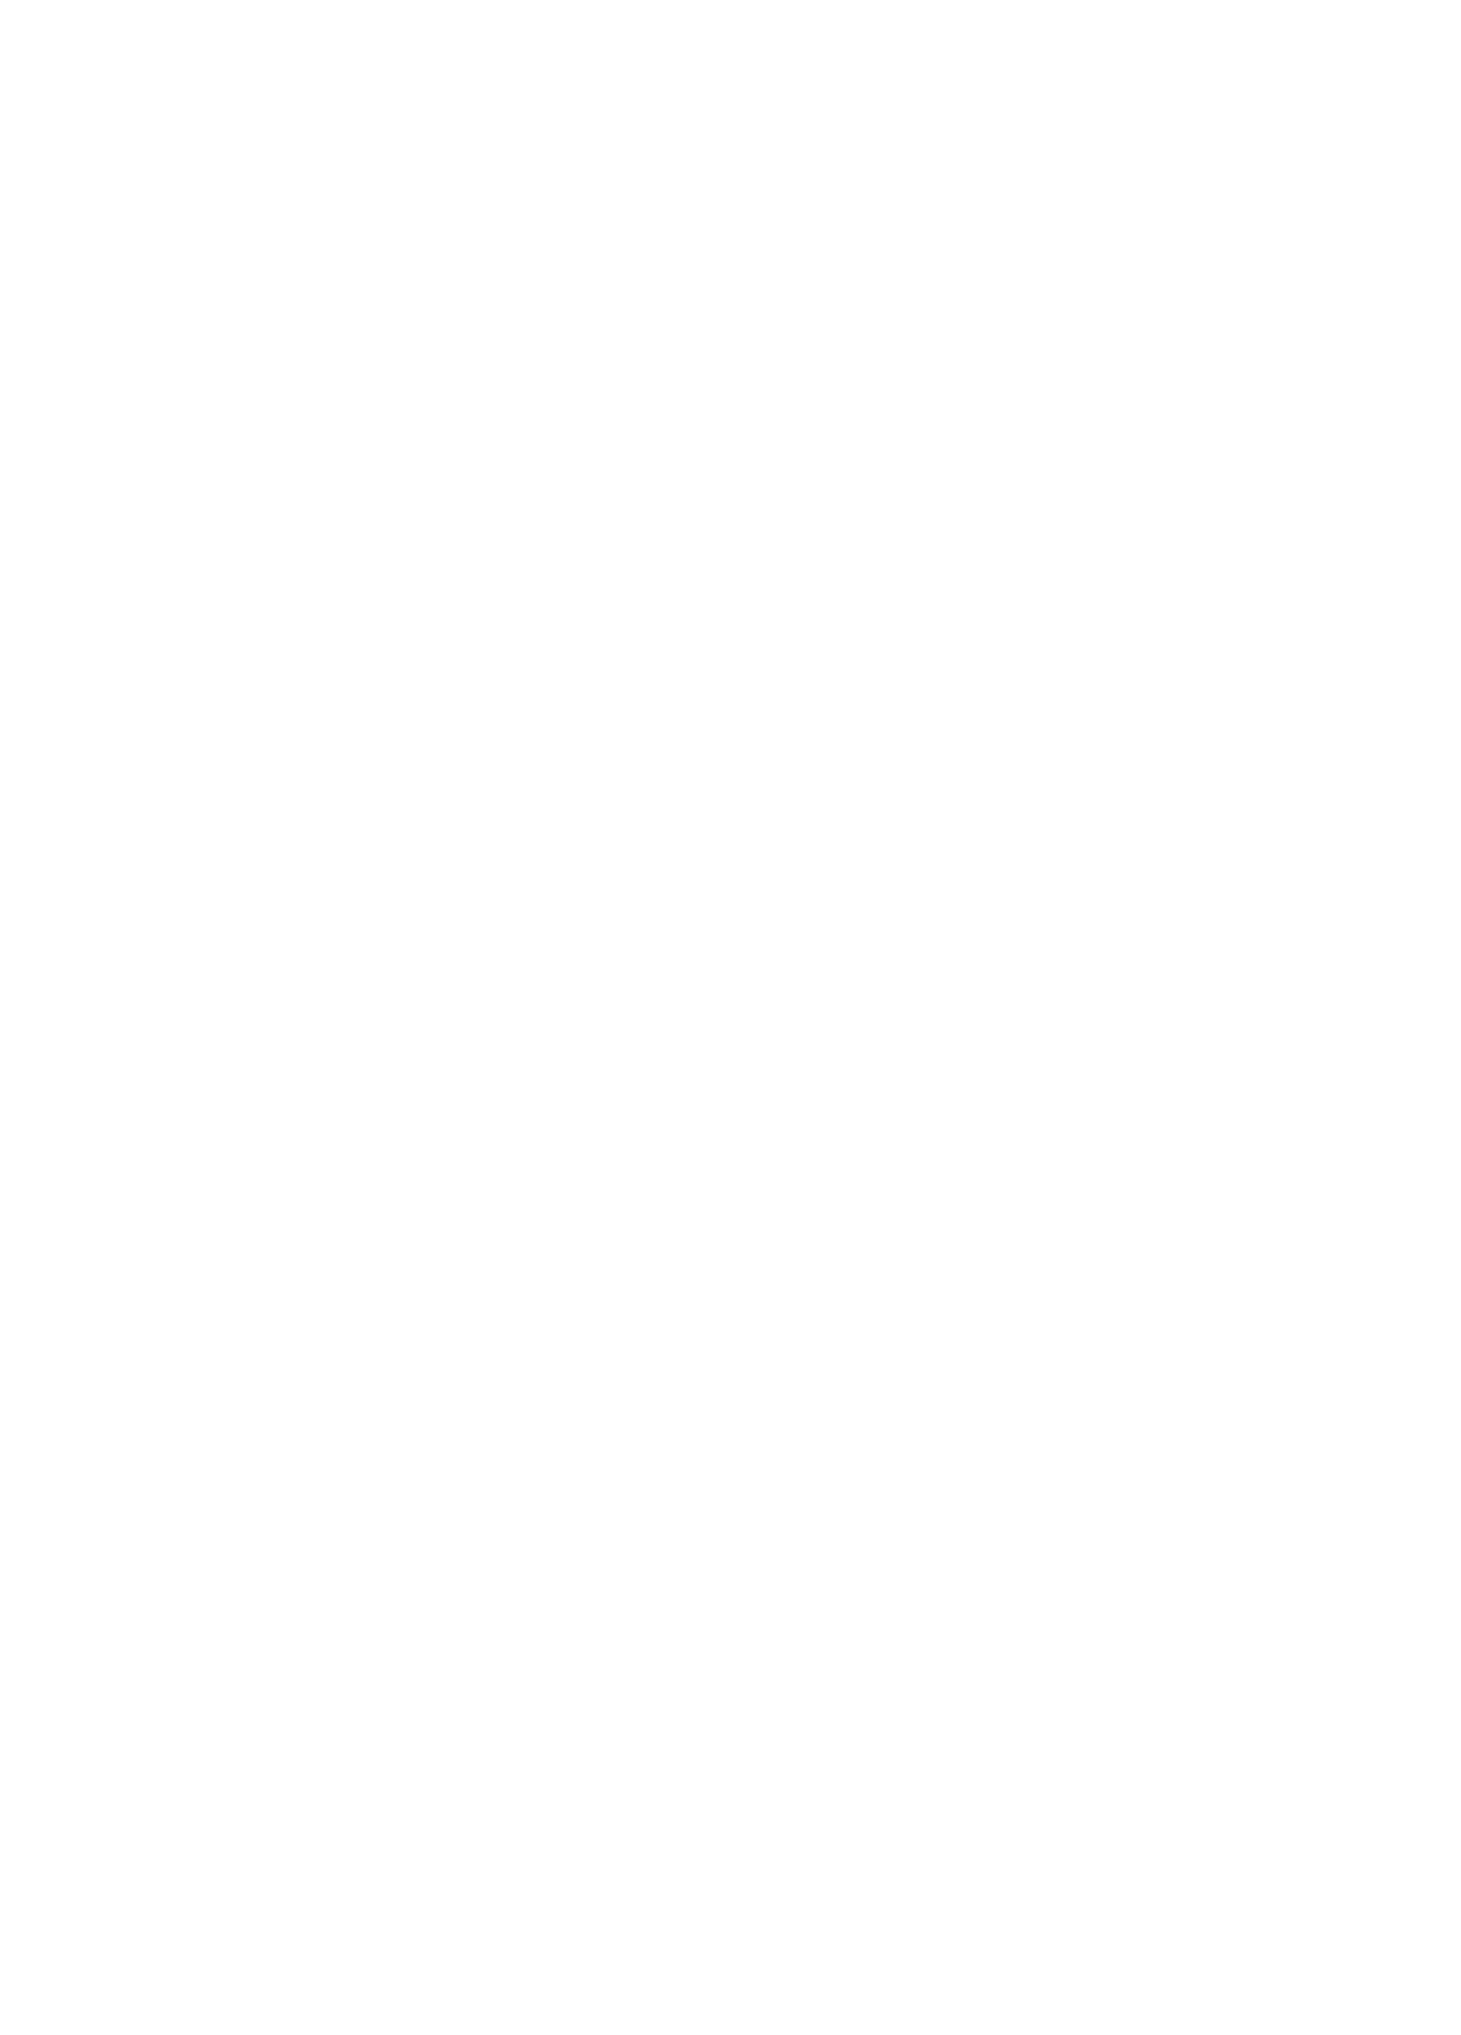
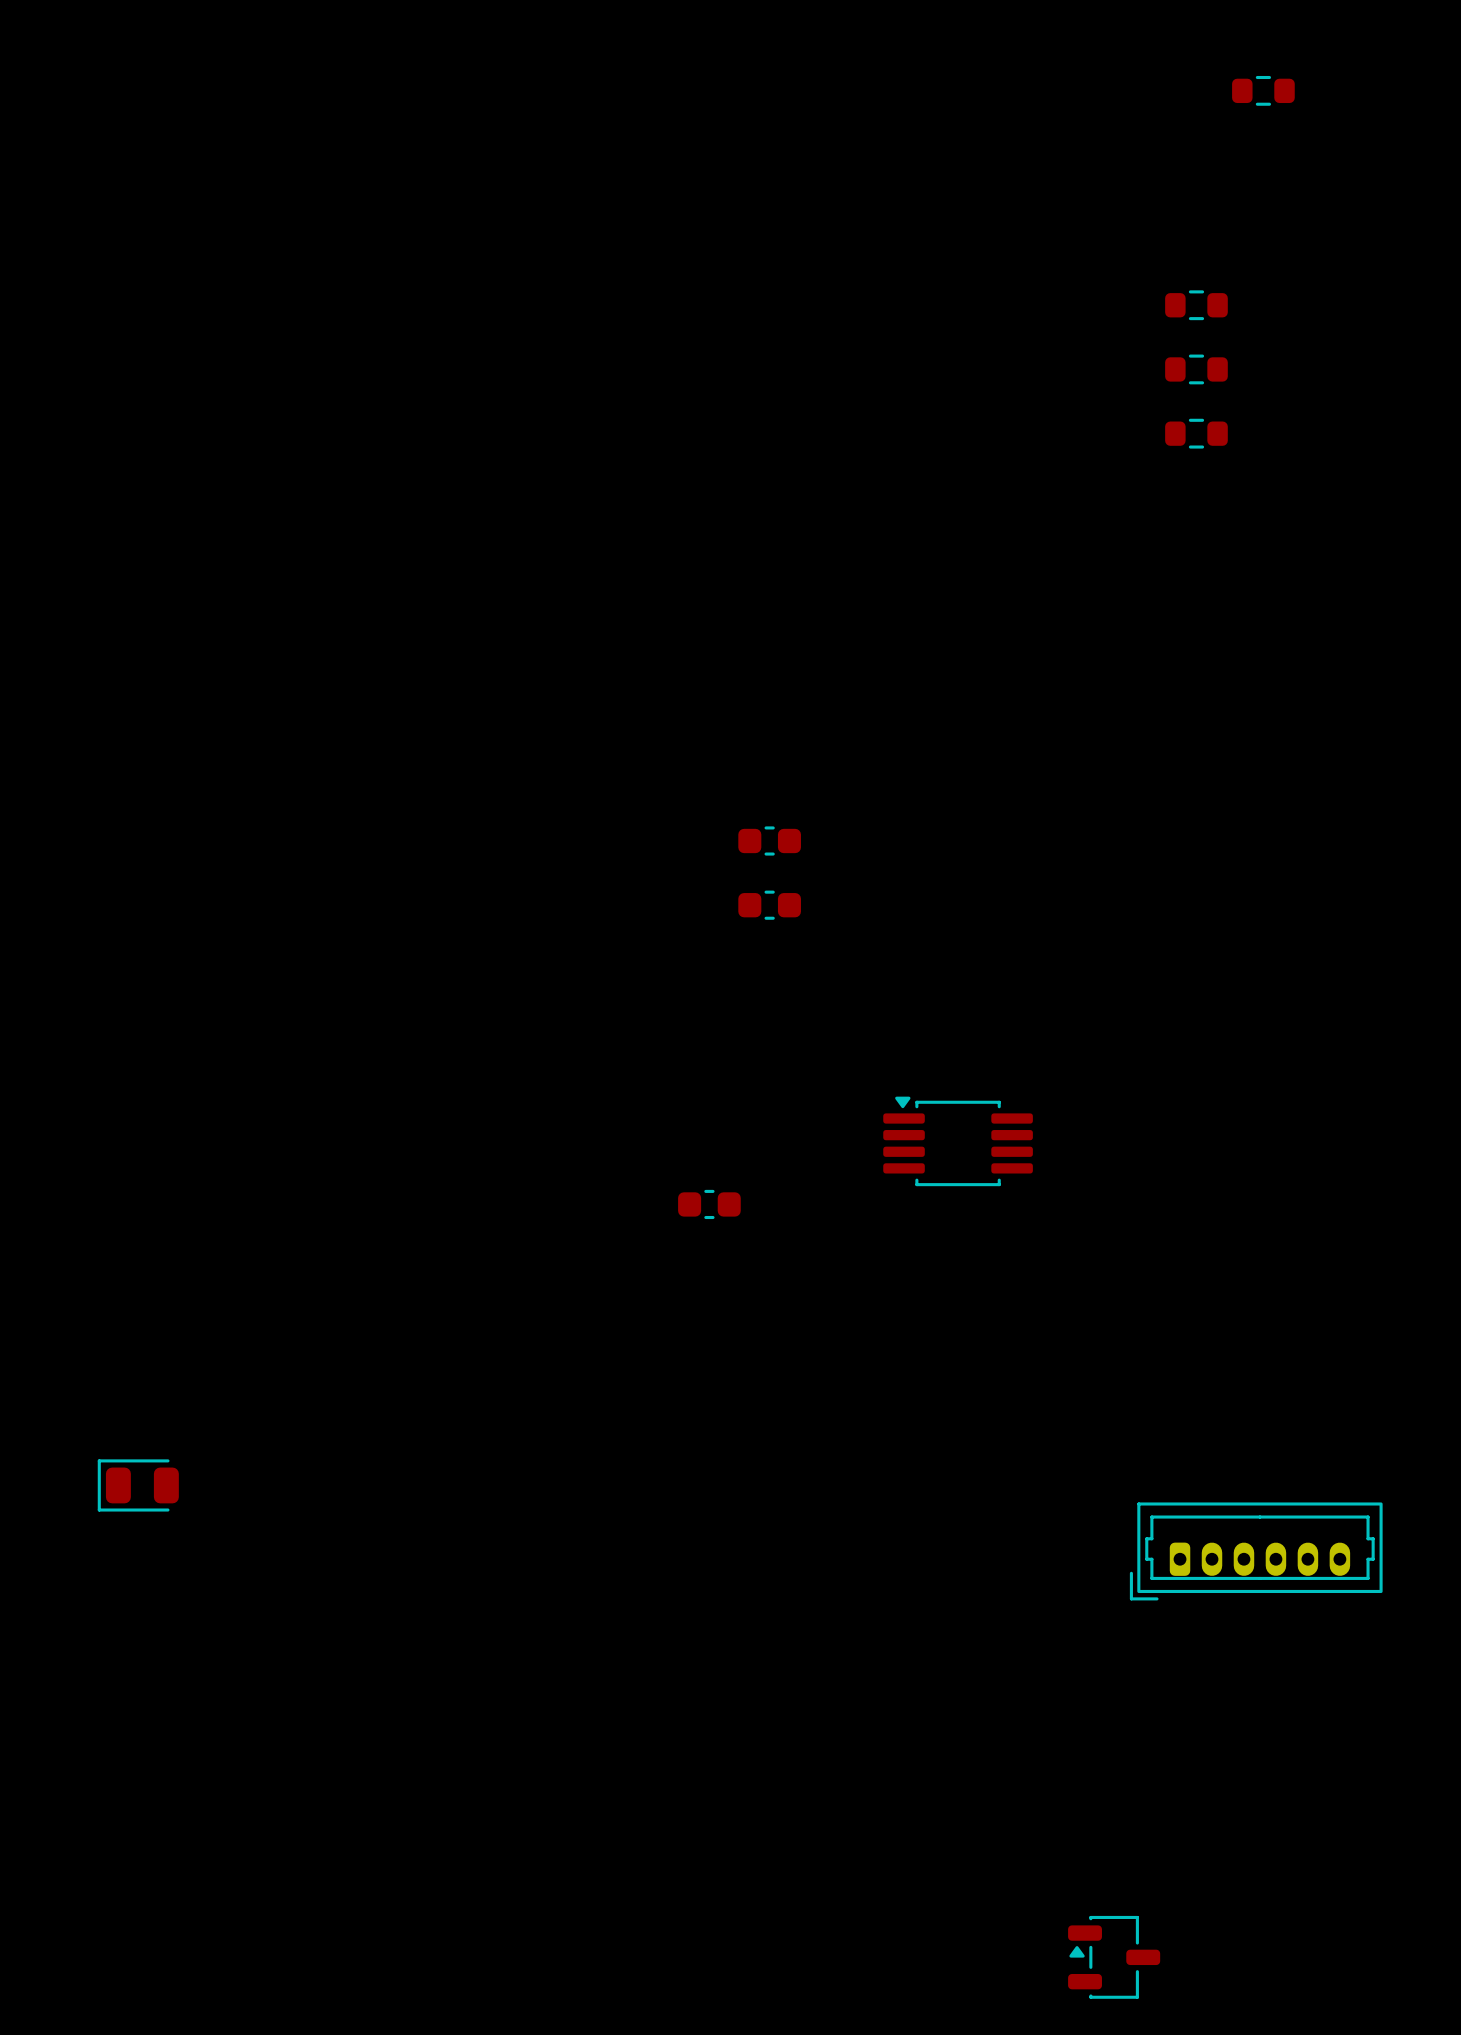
part: none -> (1263, 90)
part: none -> (1196, 305)
part: none -> (1196, 369)
part: none -> (1196, 433)
part: none -> (769, 840)
part: none -> (769, 905)
part: none -> (958, 1141)
part: none -> (709, 1204)
part: none -> (138, 1485)
part: none -> (1256, 1551)
part: none -> (1114, 1957)

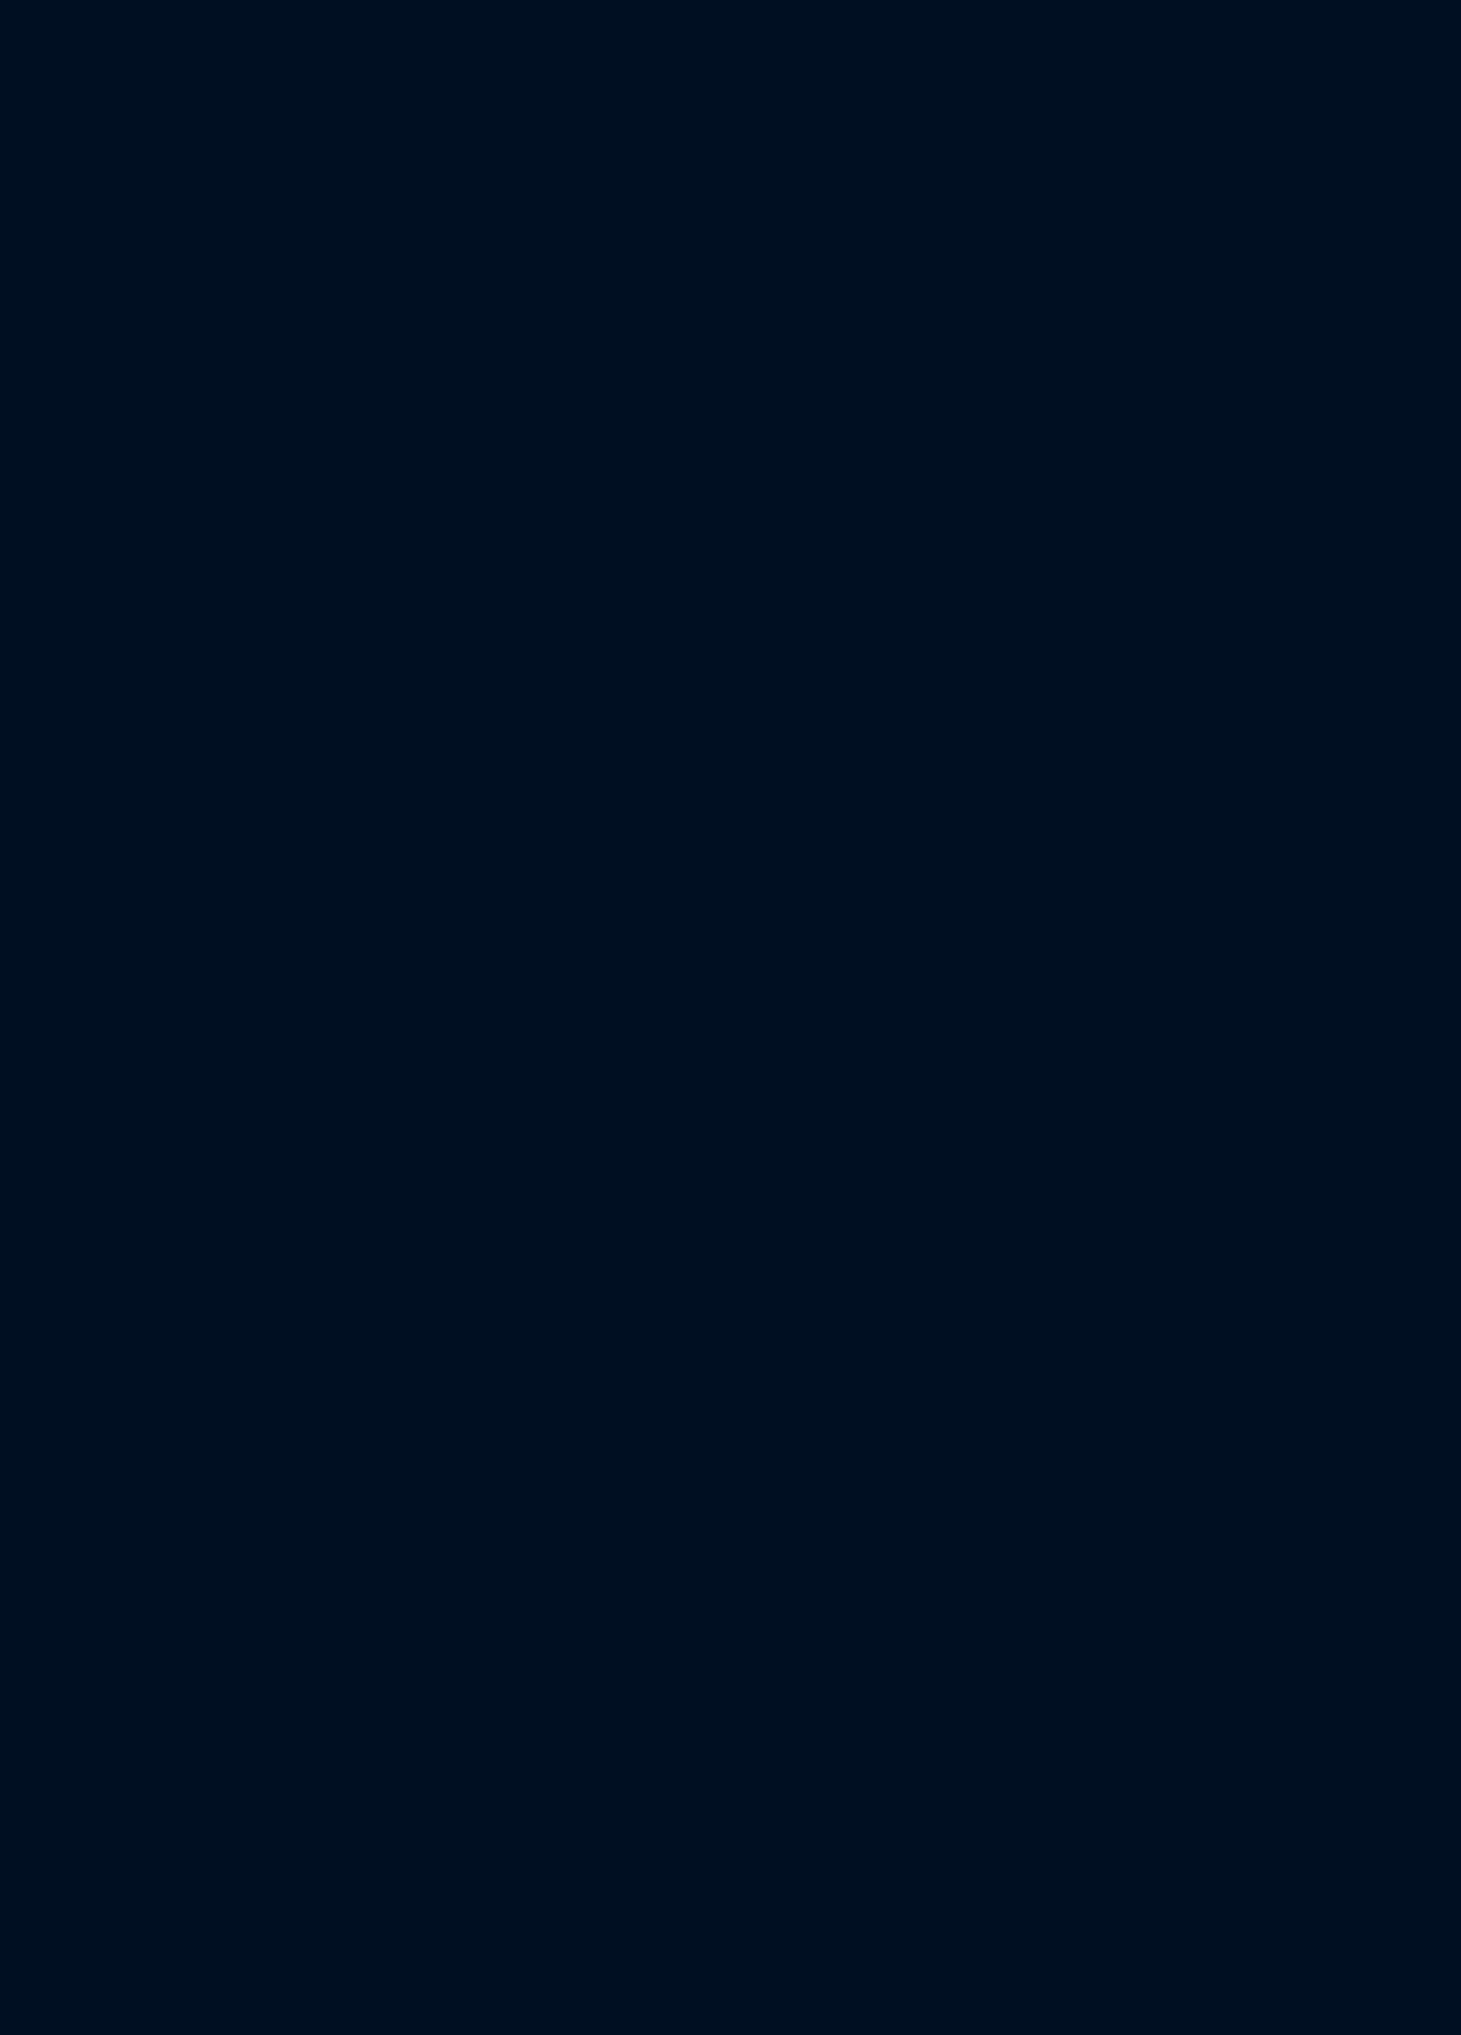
part: (1263, 90) -> none
part: (1196, 305) -> none
part: (1196, 369) -> none
part: (1196, 433) -> none
part: (769, 840) -> none
part: (769, 905) -> none
part: (958, 1141) -> none
part: (709, 1204) -> none
part: (138, 1485) -> none
part: (1256, 1551) -> none
part: (1114, 1957) -> none

